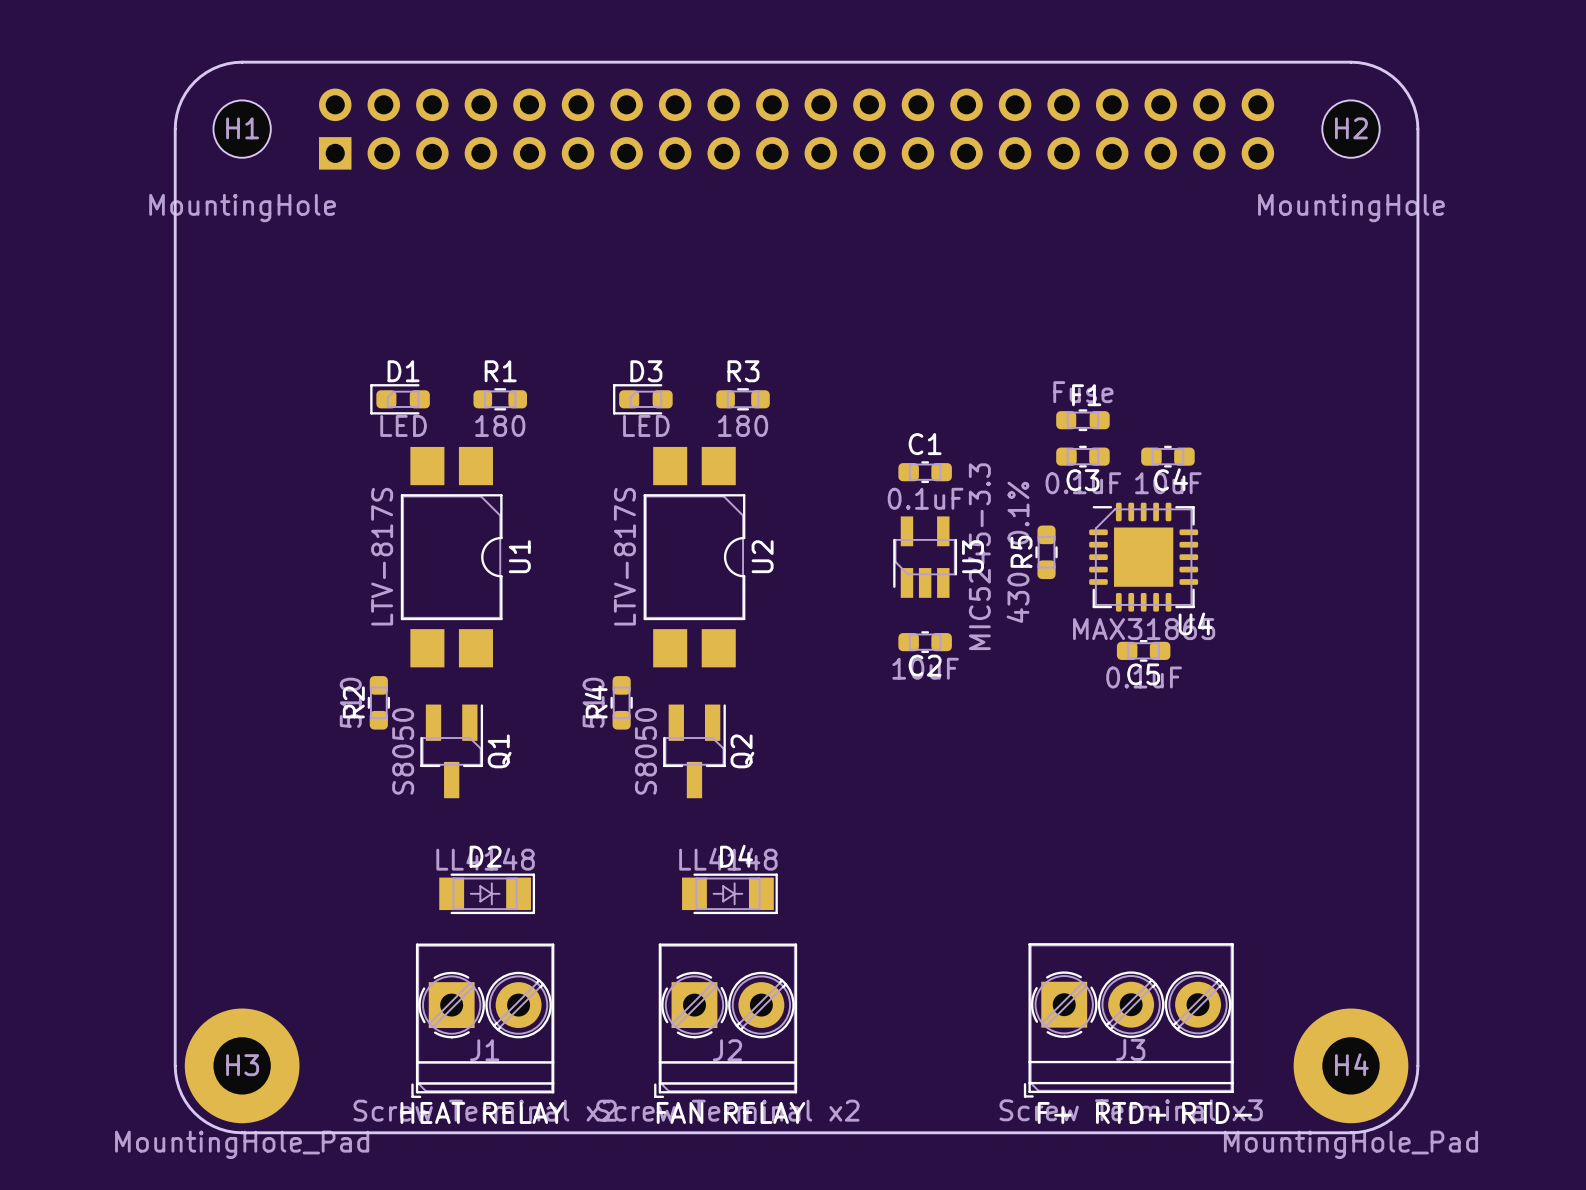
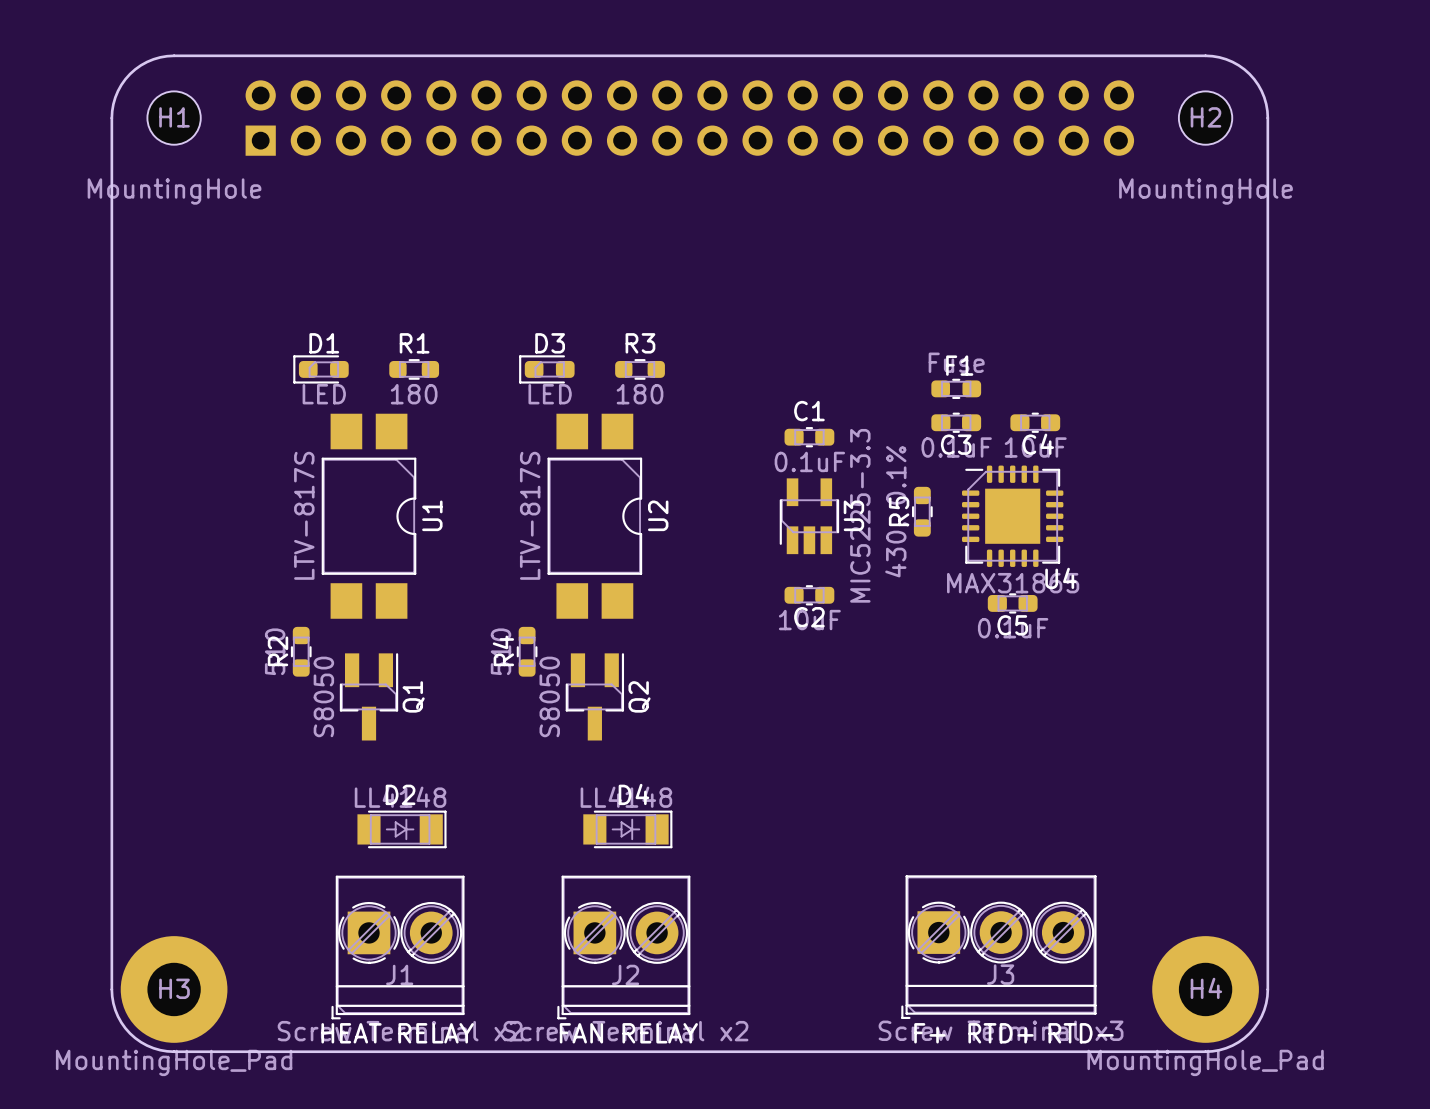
U3 value: MIC5245-3.3 (979, 556) -> MIC5225-3.3 (860, 515)

